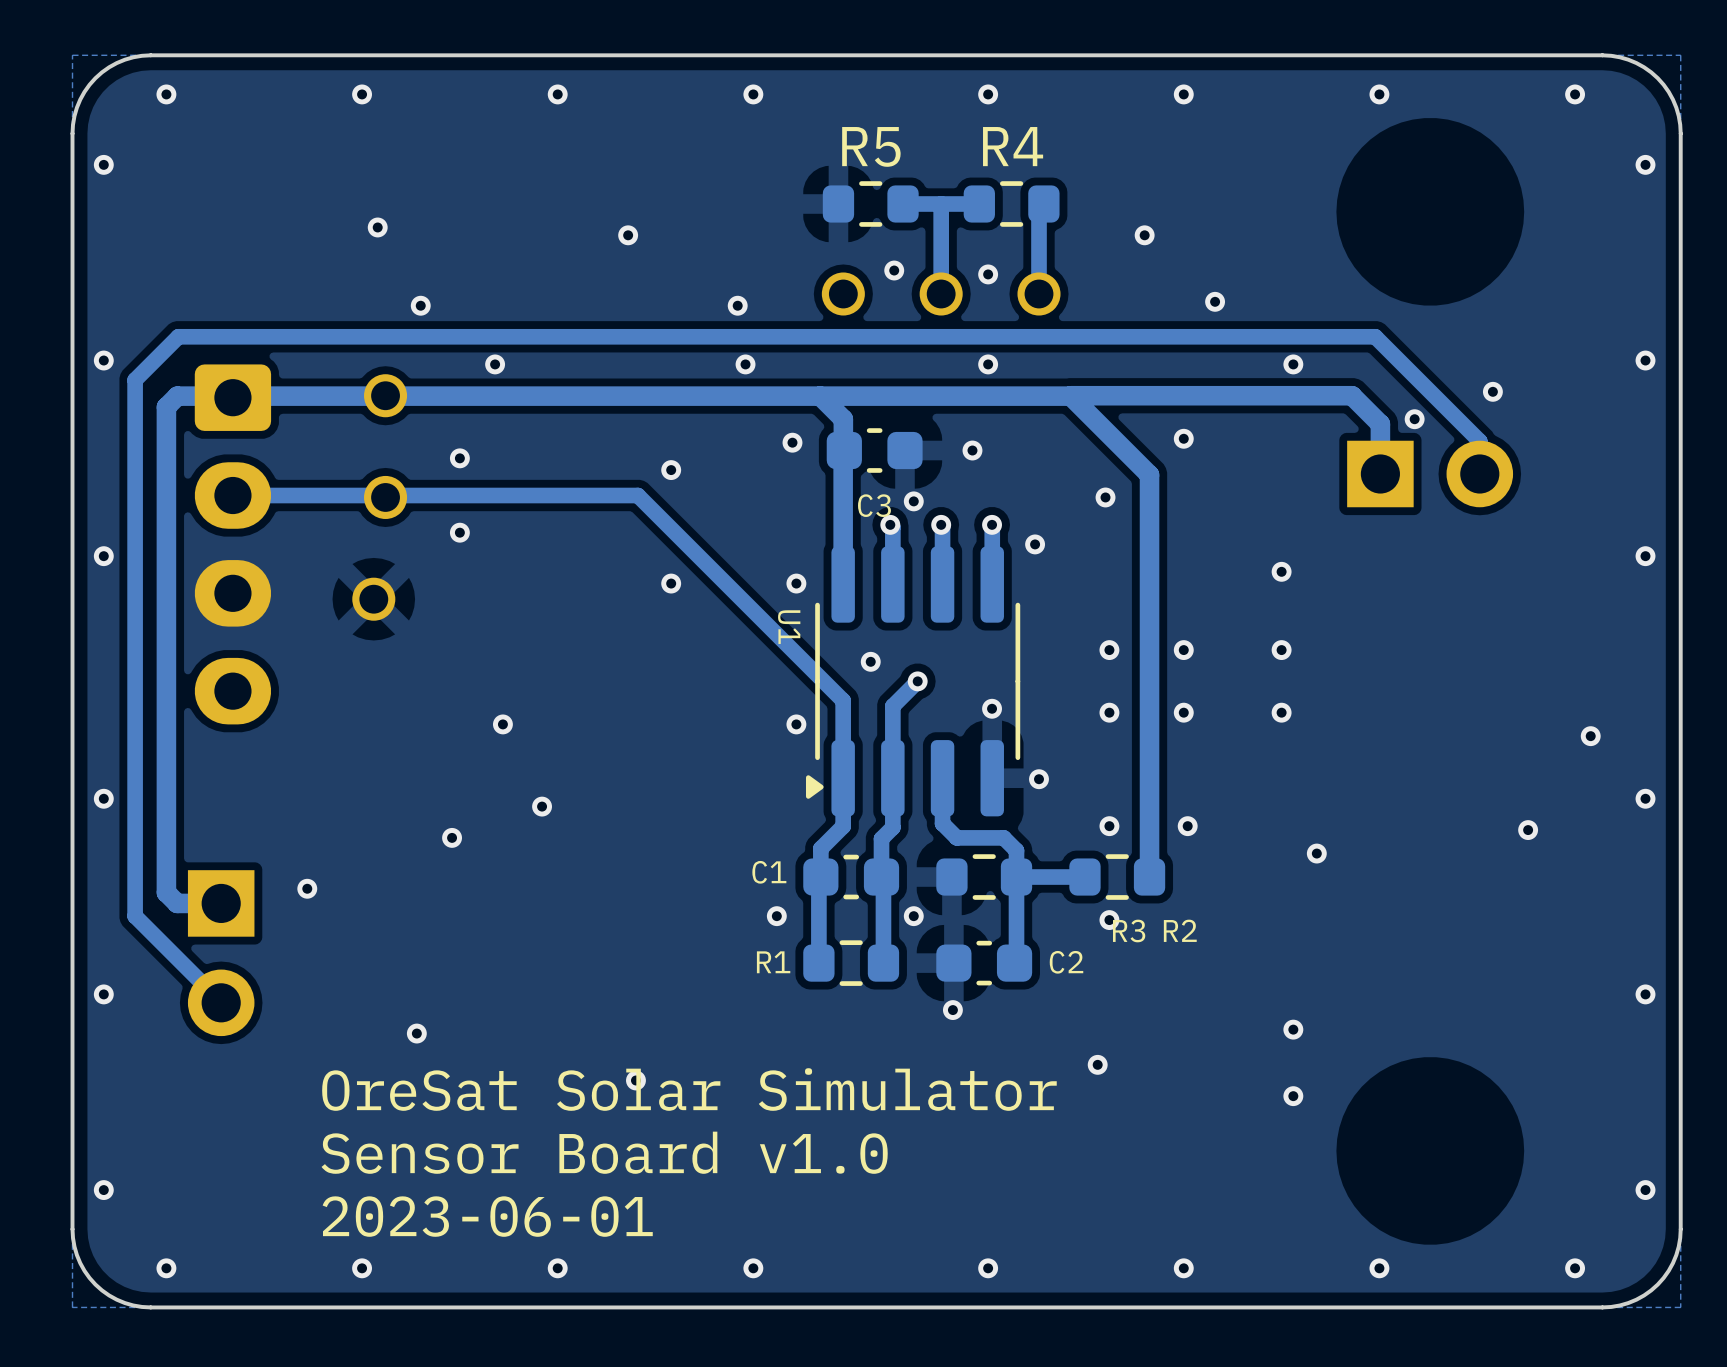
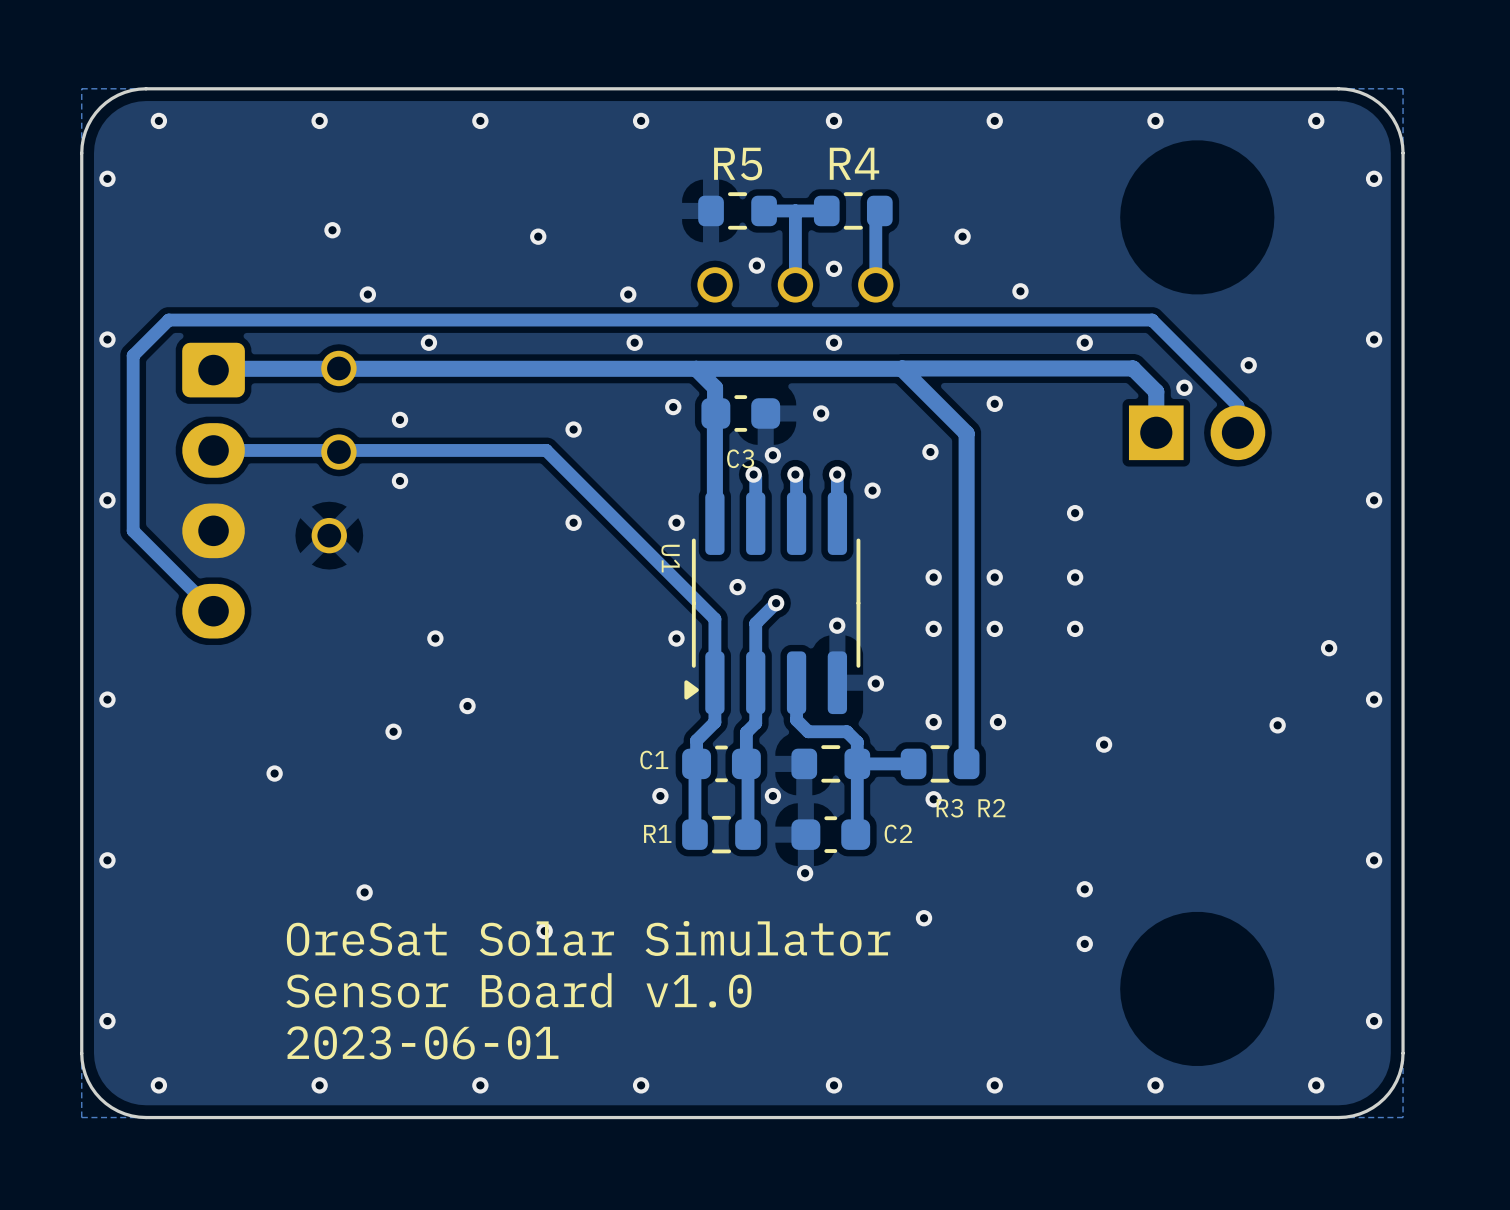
track: (221, 396) (177, 396) (166, 407) (166, 892) (177, 903) (221, 903) -> none
track: (135, 593) (135, 916) (221, 1002) -> (133, 530) (213, 611)
part: (221, 953) -> none

